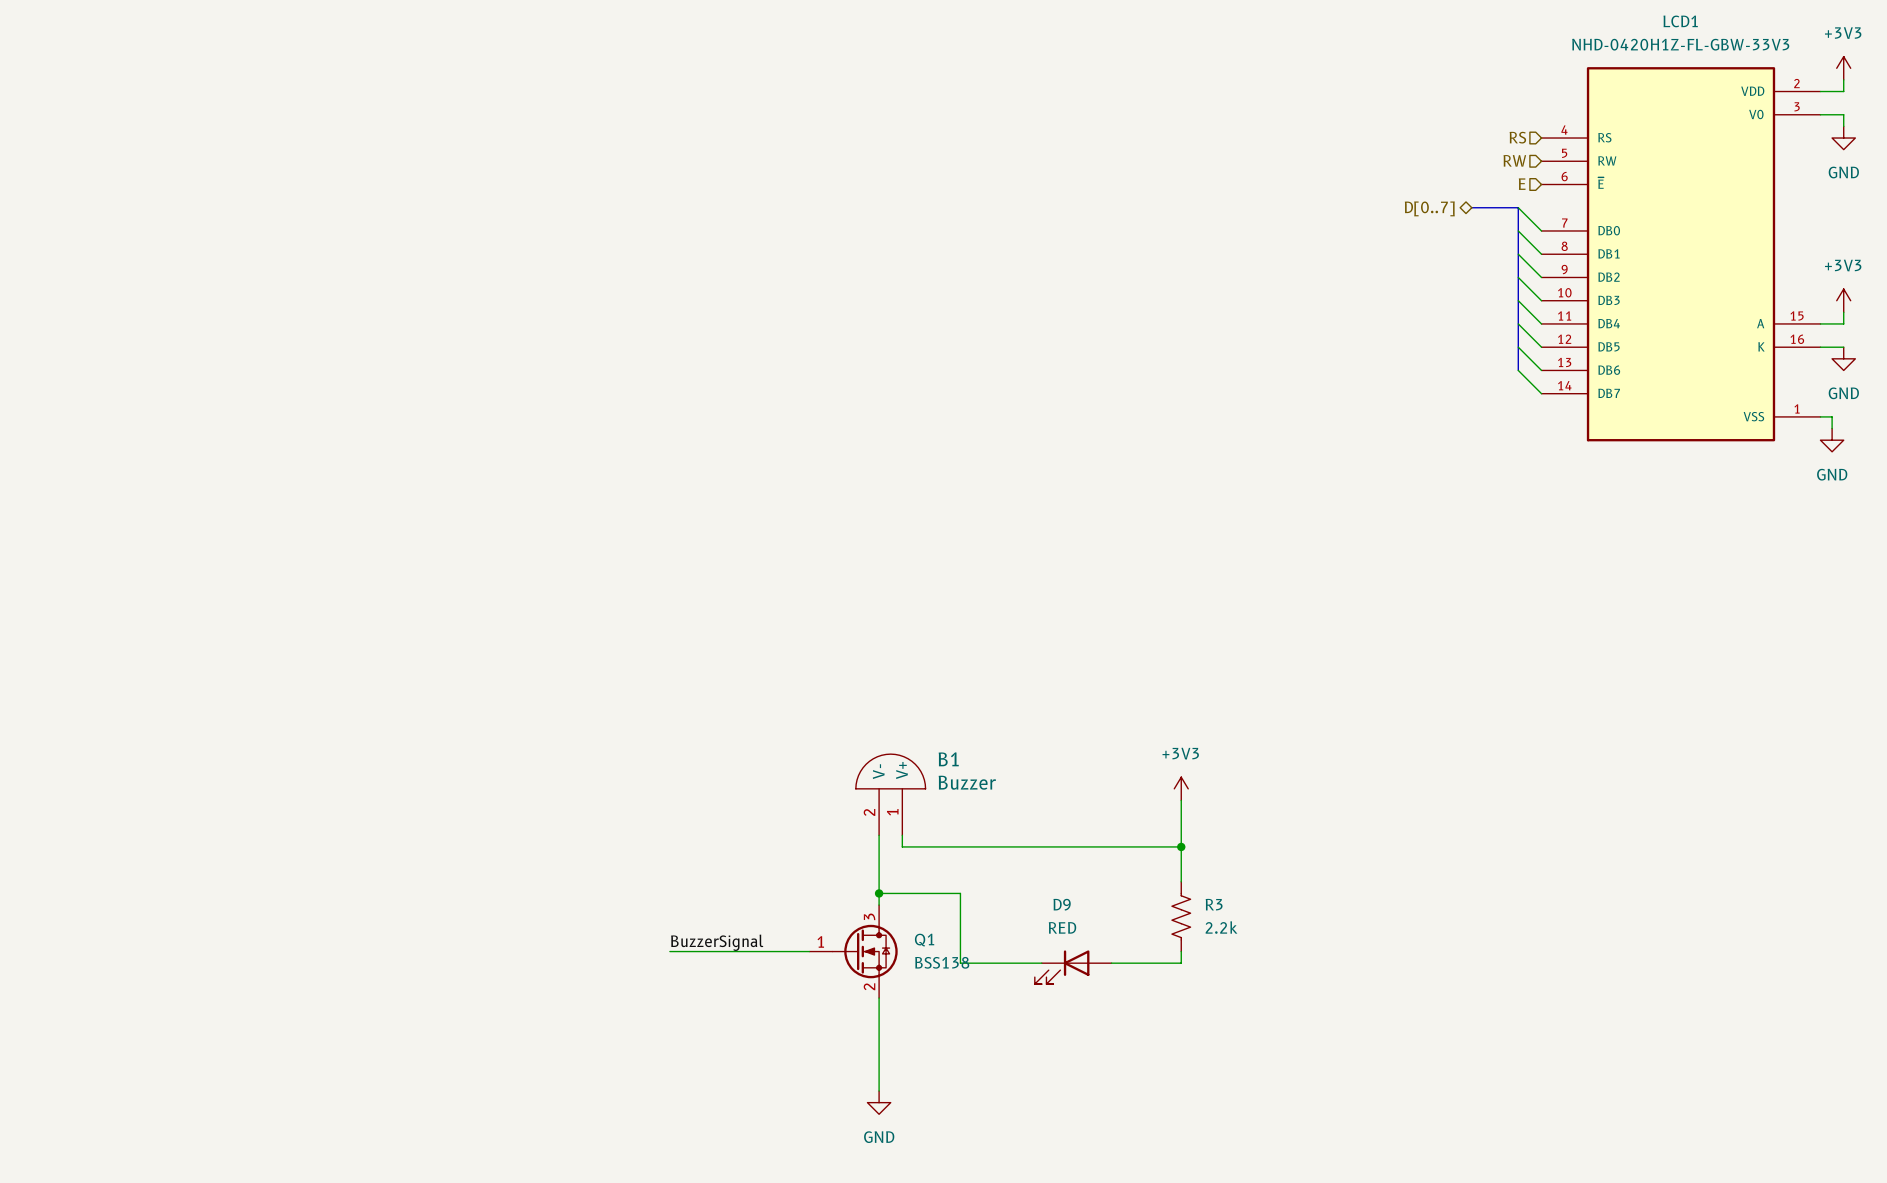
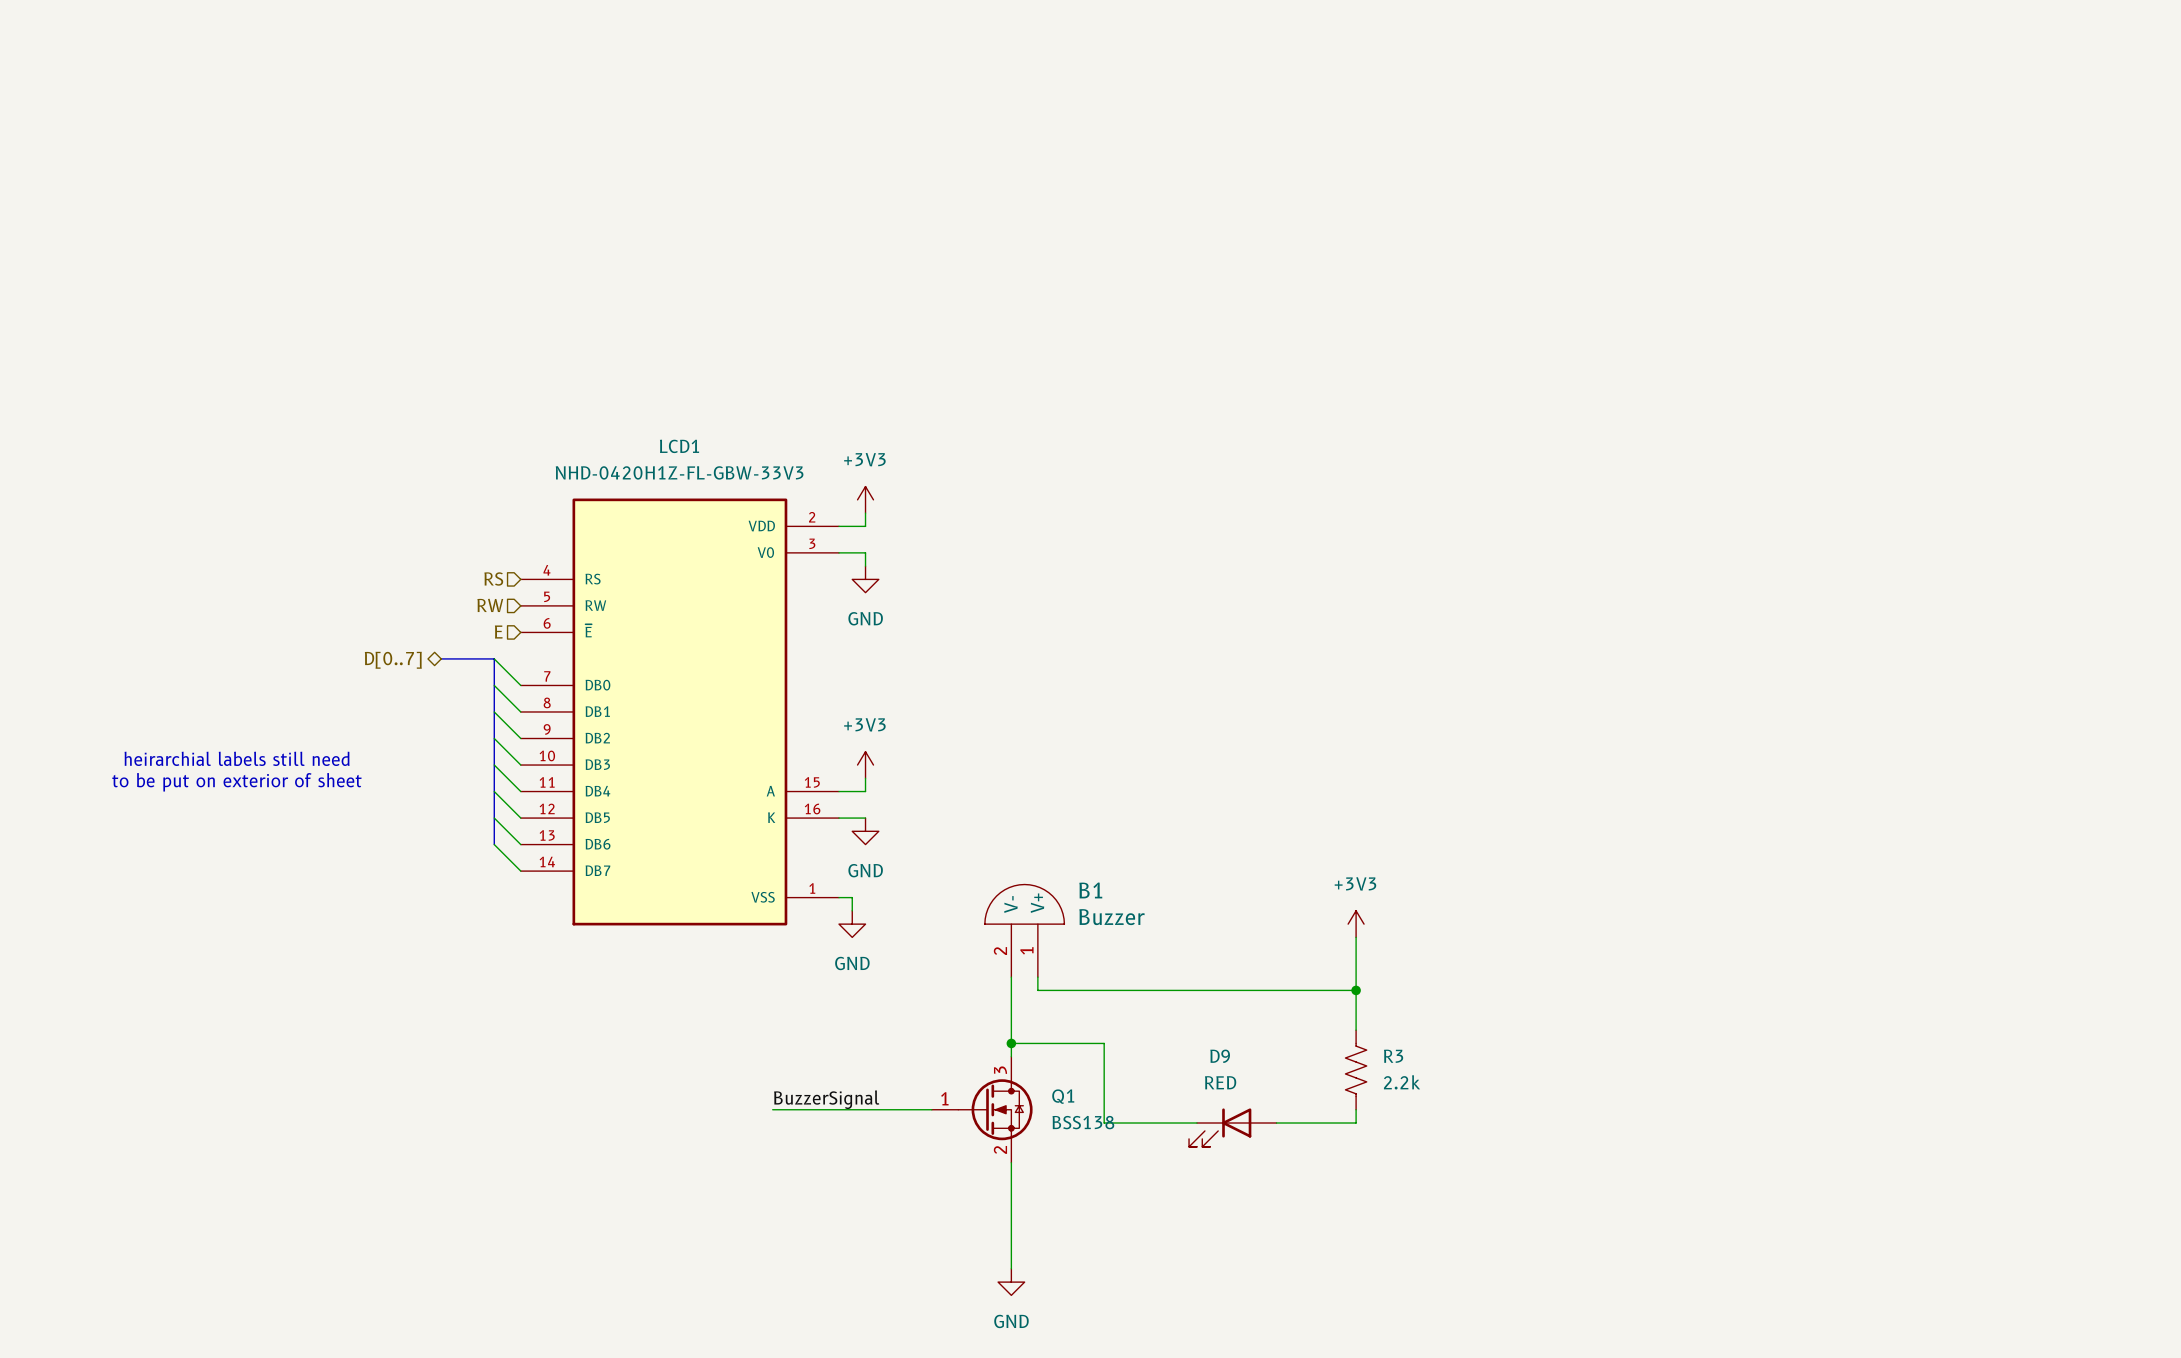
power symbol: +3V3 (1843, 68) -> none
wire: (1843, 79) (1843, 91) (1820, 91) -> none
wire: (1820, 114) (1843, 114) (1843, 126) -> none
hierarchical label: RS (1517, 137) -> none
power symbol: GND (1843, 138) -> none
hierarchical label: RW (1514, 160) -> none
hierarchical label: E (1522, 184) -> none
bus: (1471, 207) (1518, 207) (1518, 370) -> none
wire: (1518, 207) (1541, 230) -> none
hierarchical label: D[0..7] (1429, 208) -> none
wire: (1518, 230) (1541, 254) -> none
wire: (1518, 254) (1541, 277) -> none
LCD1 position: (1681, 254) -> (679, 711)
wire: (1518, 277) (1541, 300) -> none
wire: (1518, 300) (1541, 323) -> none
power symbol: +3V3 (1843, 300) -> none
wire: (1843, 312) (1843, 323) (1820, 323) -> none
wire: (1518, 323) (1541, 347) -> none
wire: (1518, 347) (1541, 370) -> none
wire: (1820, 347) (1843, 347) -> none
power symbol: GND (1843, 358) -> none
wire: (1518, 370) (1541, 393) -> none
power symbol: none -> +3V3 (865, 499)
wire: (1820, 416) (1832, 416) (1832, 428) -> none
wire: none -> (865, 513) (865, 526) (839, 526)
power symbol: GND (1832, 440) -> none
wire: none -> (839, 552) (865, 552) (865, 566)
hierarchical label: none -> RS (493, 578)
power symbol: none -> GND (865, 579)
hierarchical label: none -> RW (490, 605)
hierarchical label: none -> E (498, 632)
bus: none -> (441, 658) (494, 658) (494, 844)
wire: none -> (494, 658) (520, 685)
hierarchical label: none -> D[0..7] (393, 660)
wire: none -> (494, 685) (520, 711)
wire: none -> (494, 711) (520, 738)
wire: none -> (494, 738) (520, 765)
text: none -> heirarchial labels still need (237, 758)
wire: none -> (494, 765) (520, 791)
power symbol: none -> +3V3 (865, 765)
wire: none -> (865, 778) (865, 791) (839, 791)
text: none -> to be put on exterior of sheet (236, 782)
wire: none -> (494, 791) (520, 818)
wire: none -> (494, 818) (520, 844)
wire: none -> (839, 818) (865, 818)
power symbol: none -> GND (865, 831)
wire: none -> (494, 844) (520, 871)
wire: none -> (839, 897) (852, 897) (852, 910)
power symbol: none -> GND (852, 924)

